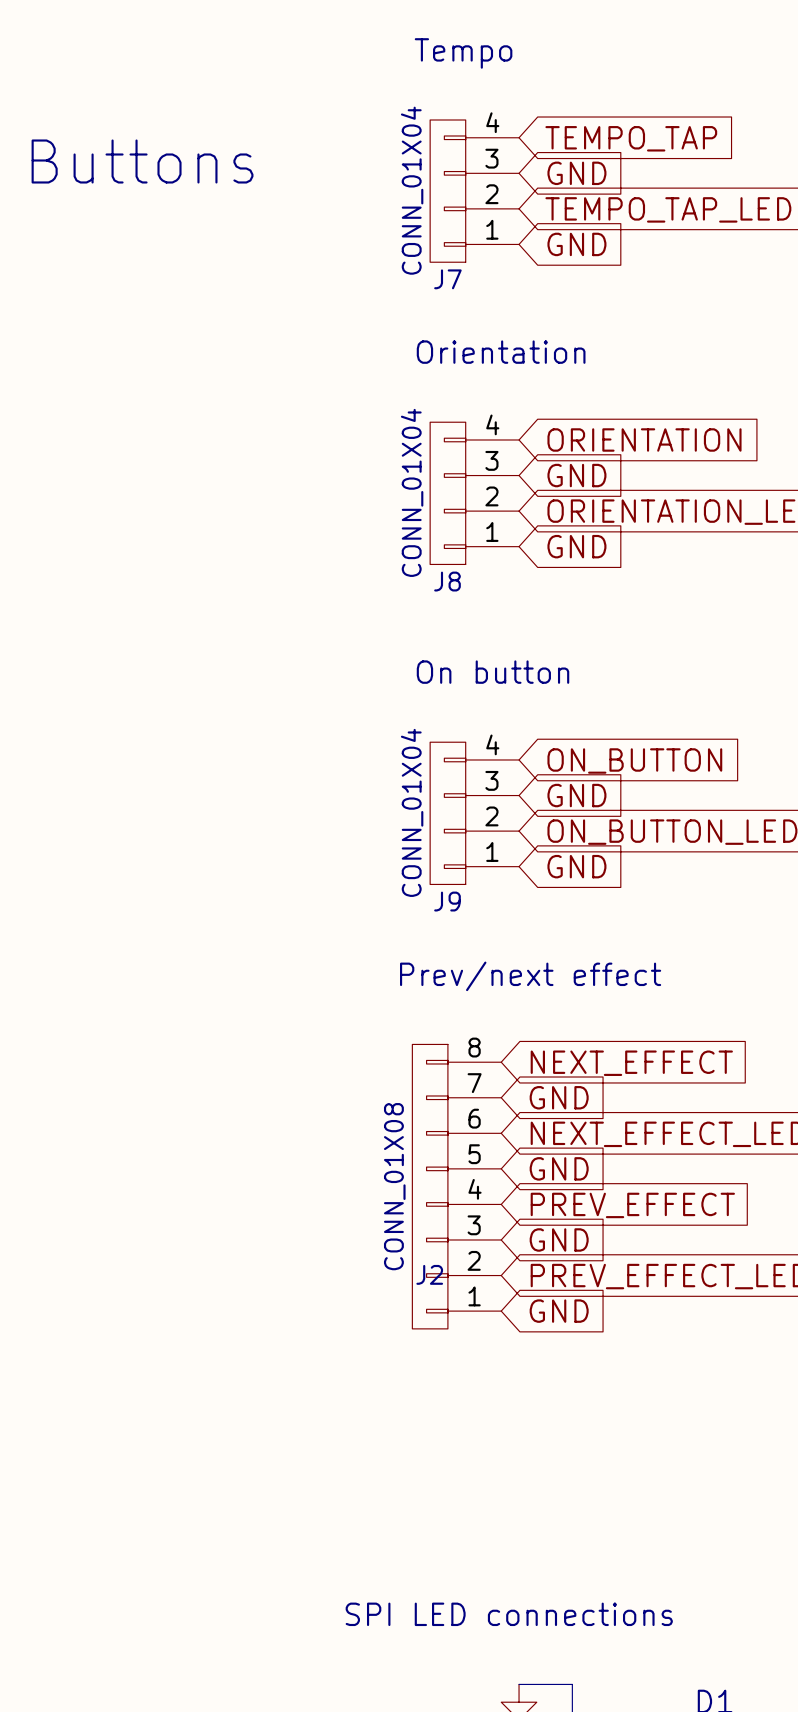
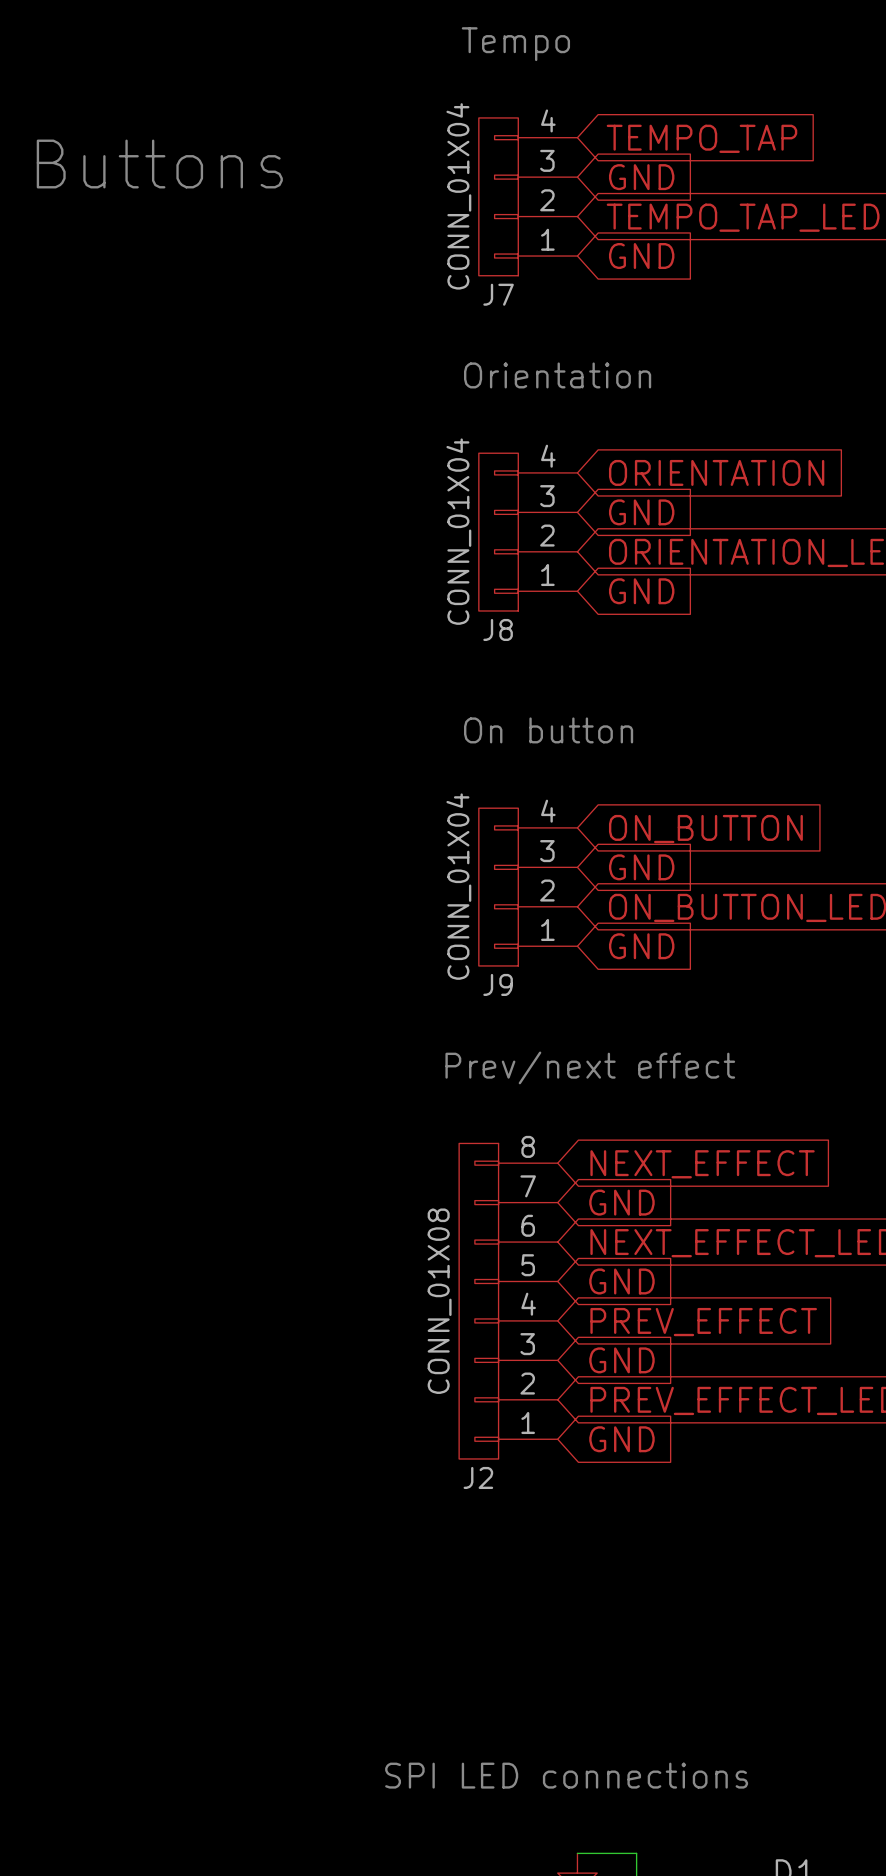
J2 name position: J2 (429, 1274) -> J2 (478, 1477)

